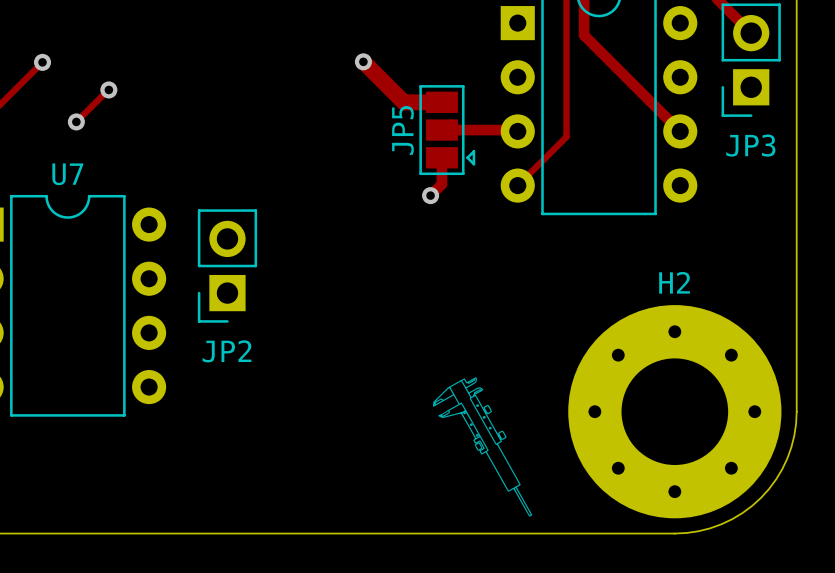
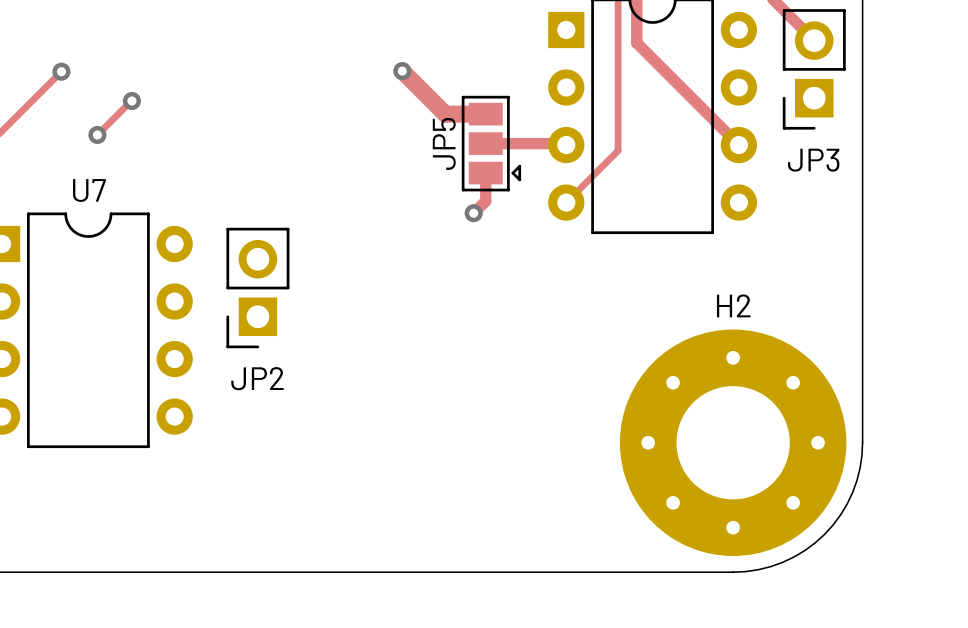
drawing: [432, 377, 533, 517] -> none

